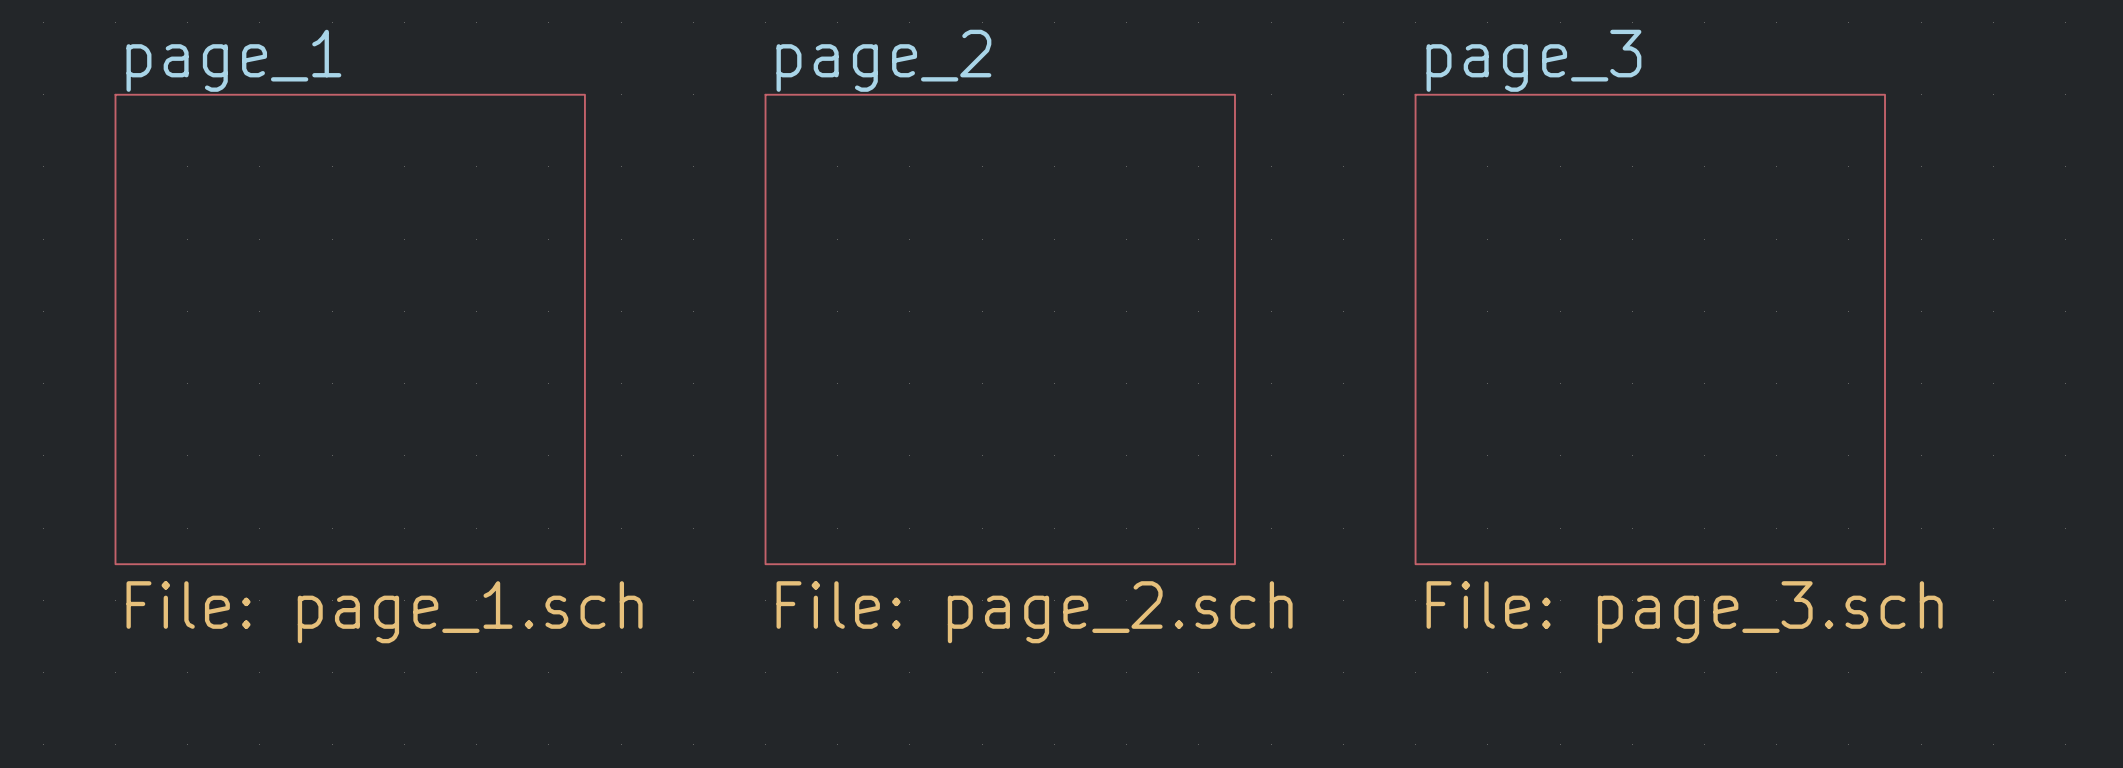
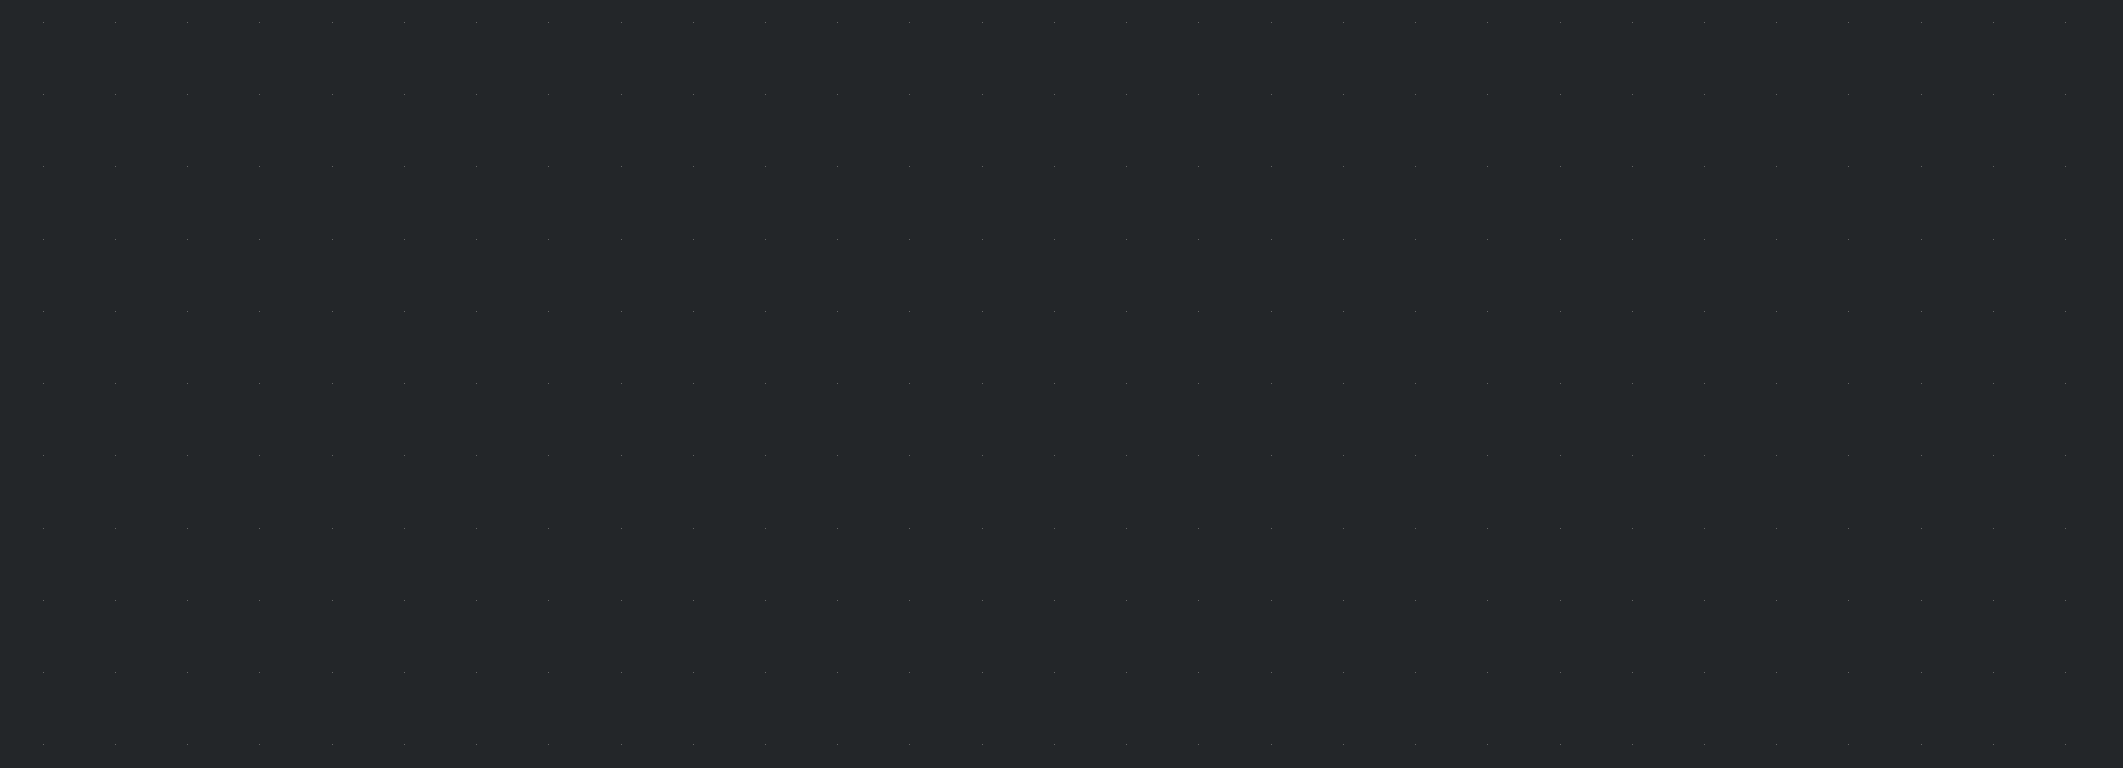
sheet page_1: File: page_1.sch (350, 329) -> none
sheet page_2: File: page_2.sch (1000, 329) -> none
sheet page_3: File: page_3.sch (1650, 329) -> none

